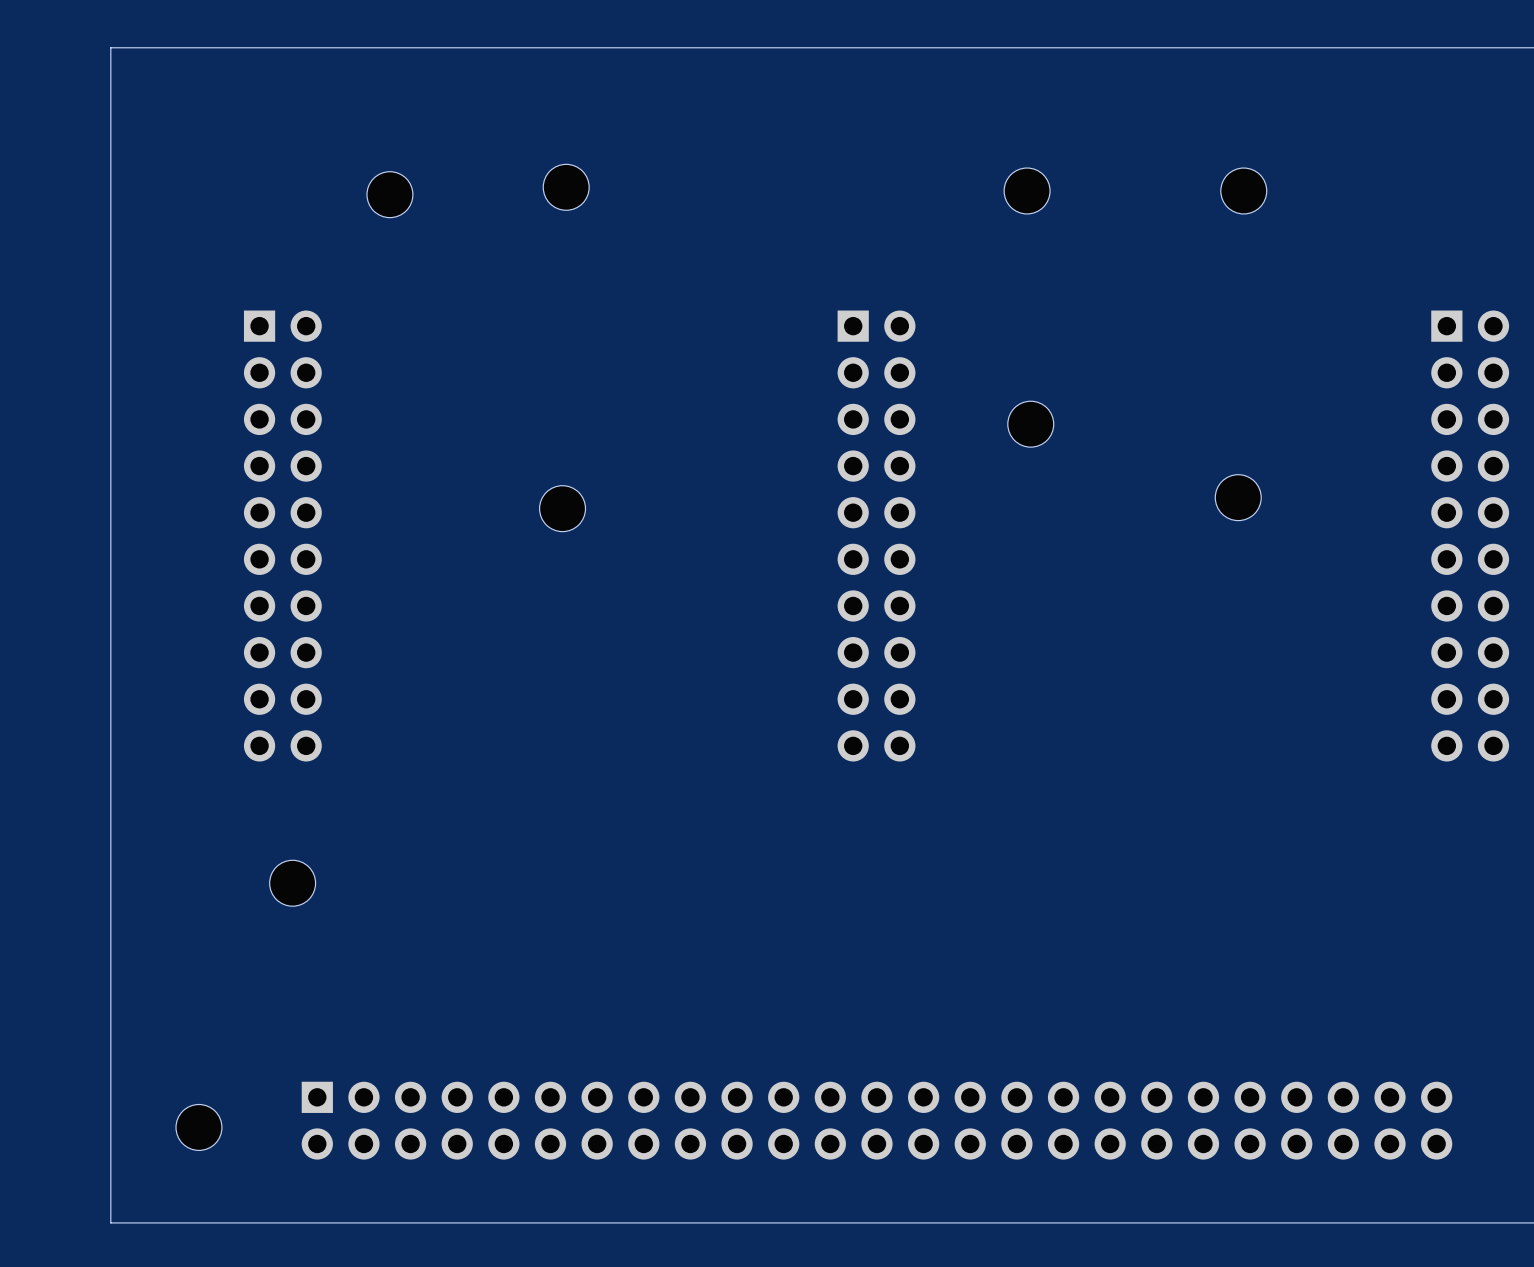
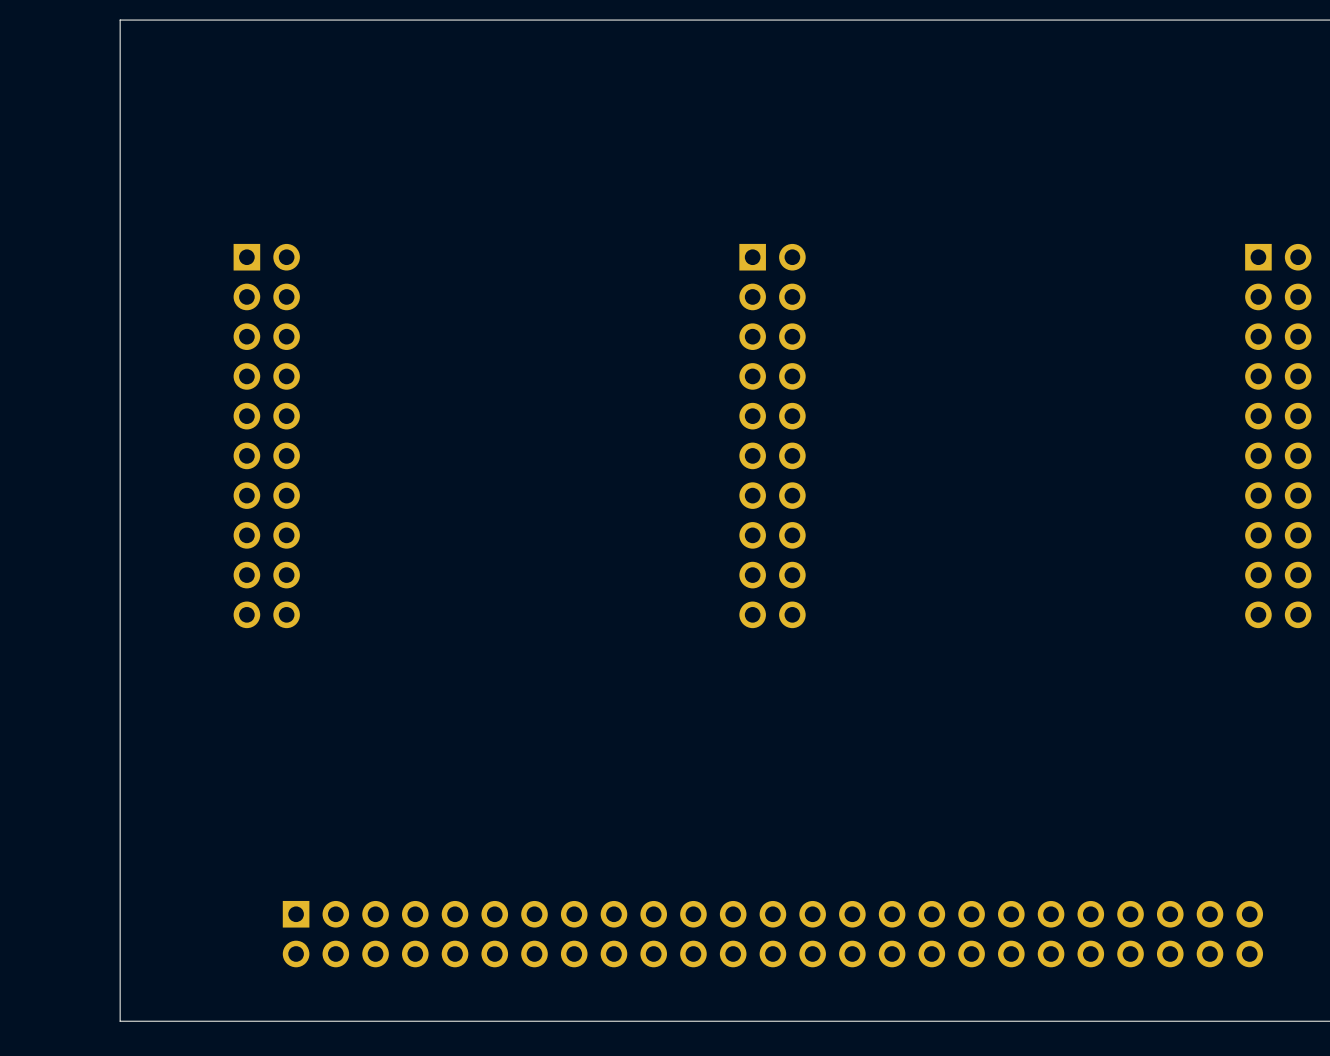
part: (566, 187) -> none
part: (1027, 190) -> none
part: (1243, 190) -> none
part: (389, 194) -> none
part: (1030, 424) -> none
part: (1238, 497) -> none
part: (562, 508) -> none
part: (292, 883) -> none
part: (198, 1127) -> none

